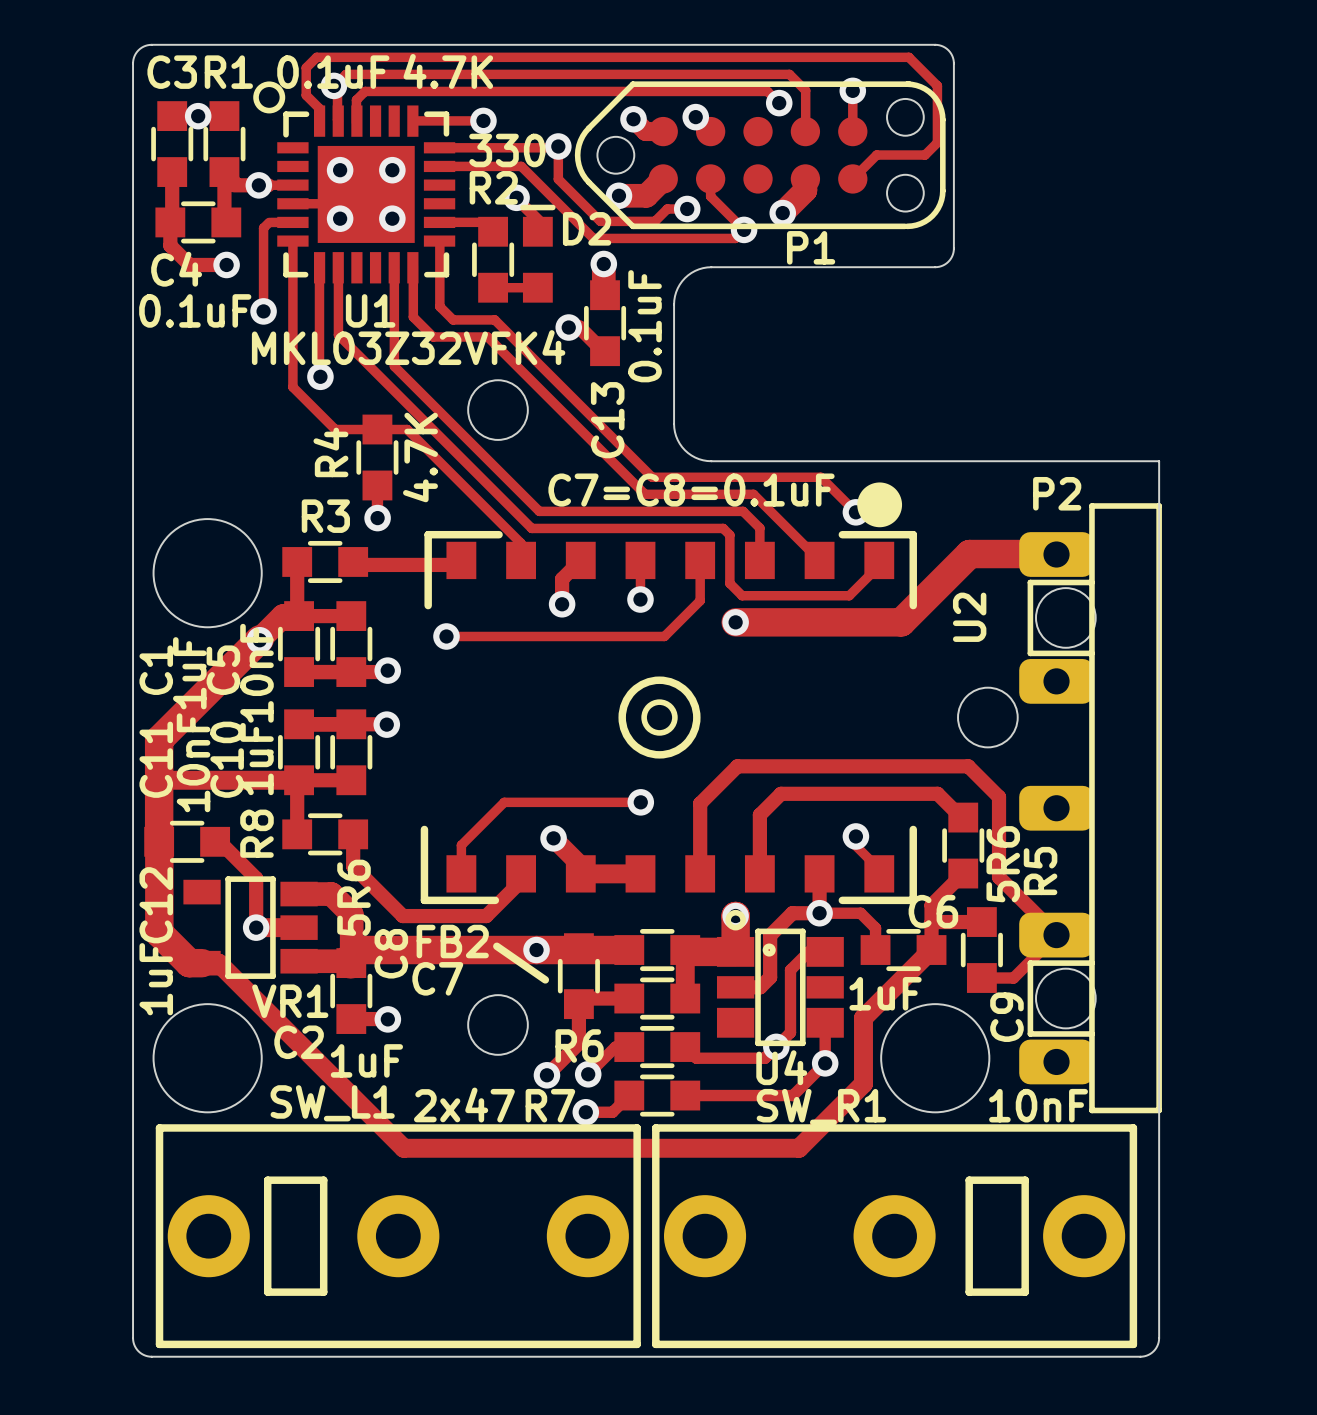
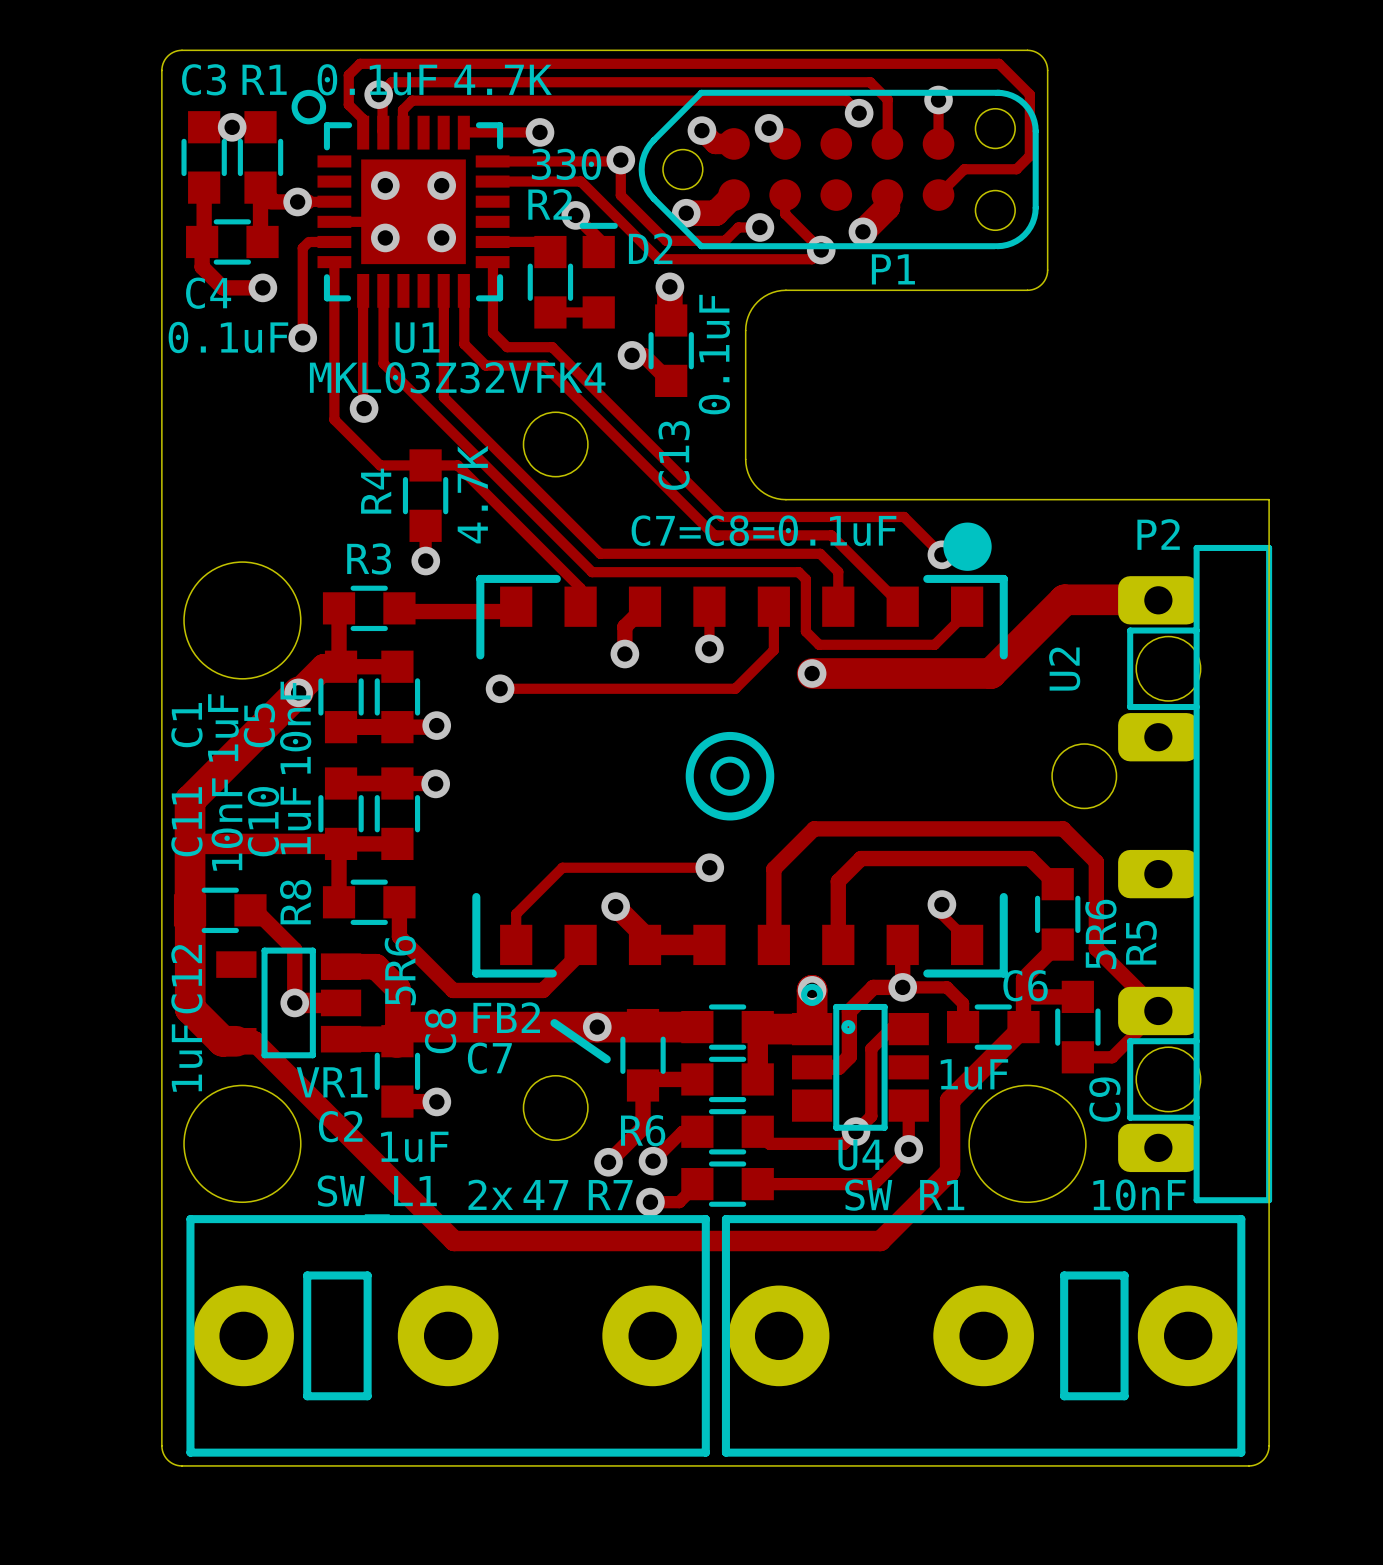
SW_L1 footprint: [155, 1124, 641, 1349] -> [186, 1215, 710, 1457]
SW_R1 footprint: [652, 1124, 1138, 1349] -> [721, 1215, 1246, 1457]

